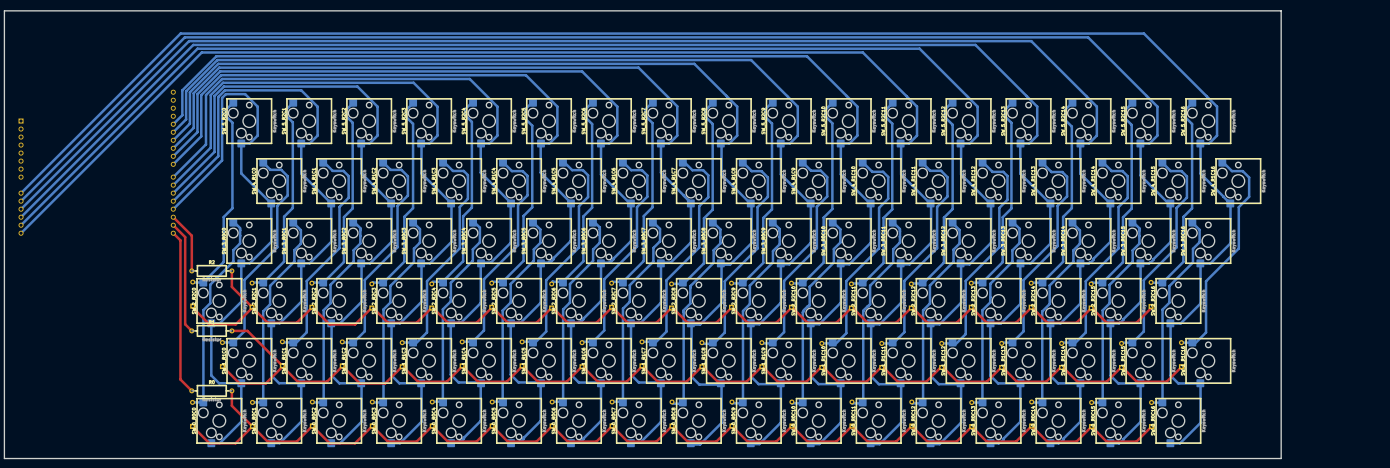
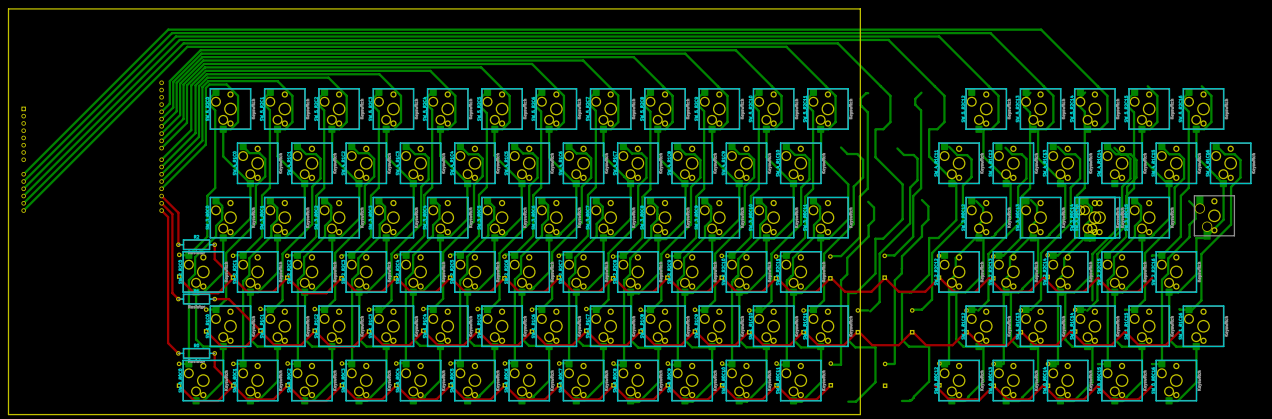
board edge: (4, 10) (1281, 10) (1281, 458) (4, 458) (4, 10) -> (8, 8) (8, 414) (860, 414) (860, 8) (8, 8)
bottom track: none -> (1147, 86) (1157, 95) (1157, 122) (1150, 129) (1142, 129)
bottom track: none -> (1201, 86) (1211, 95) (1211, 122) (1204, 129) (1196, 129)
bottom track: (1072, 102) (1065, 109) (1065, 120) (1071, 126) (1071, 208) (1063, 216) (1063, 261) (1042, 282) (1031, 283) -> none
bottom track: none -> (1189, 92) (1182, 99) (1182, 105) (1188, 111) (1188, 187) (1180, 195) (1180, 236) (1161, 255) (1151, 255)
bottom track: none -> (1134, 92) (1128, 98) (1128, 106) (1134, 112) (1134, 188) (1126, 196) (1126, 236) (1107, 255)
part position: (968, 123) -> (986, 110)
part position: (1028, 123) -> (1040, 110)
part position: (1088, 123) -> (1094, 110)
part position: (1148, 123) -> (1149, 110)
part position: (1208, 123) -> (1203, 110)
bottom track: (1200, 143) (1200, 173) (1230, 203) (1230, 243) (1210, 263) (1200, 263) (1200, 281) -> (1109, 147) (1115, 154) (1125, 154) (1130, 158) (1130, 178) (1122, 186) (1122, 224) (1092, 254)
bottom track: none -> (1142, 129) (1142, 158) (1169, 185) (1169, 218) (1151, 237) (1142, 238) (1142, 272) (1123, 291) (1114, 292) (1114, 339) (1121, 346) (1142, 346) (1142, 381) (1123, 400) (1114, 401)
bottom track: none -> (1196, 129) (1196, 156) (1223, 183) (1223, 219) (1205, 238) (1196, 238) (1196, 274) (1178, 292) (1169, 292) (1169, 339) (1176, 346) (1196, 346) (1196, 382) (1177, 400) (1169, 400)
bottom track: none -> (1161, 146) (1169, 154) (1179, 154) (1184, 159) (1184, 178) (1174, 187) (1174, 223) (1145, 253) (1145, 299) (1134, 309) (1125, 309)
bottom track: none -> (1218, 147) (1224, 154) (1234, 154) (1240, 160) (1240, 177) (1231, 186) (1231, 224) (1201, 254) (1201, 300) (1191, 310)
part position: (938, 182) -> (959, 165)
part position: (998, 182) -> (1013, 165)
part position: (1058, 182) -> (1067, 165)
part position: (1118, 182) -> (1122, 165)
part position: (1178, 182) -> (1176, 165)
part position: (1238, 182) -> (1230, 165)
bottom track: none -> (1134, 200) (1140, 206) (1140, 220) (1134, 226) (1134, 236) (1113, 257) (1113, 274) (1107, 280) (1107, 363)
bottom track: none -> (1189, 201) (1195, 207) (1195, 218) (1189, 224) (1189, 237) (1168, 258) (1168, 273) (1161, 279) (1161, 364) (1152, 364)
part: none -> (1214, 217)
part position: (968, 242) -> (986, 219)
part position: (1028, 242) -> (1040, 219)
part position: (1088, 242) -> (1094, 219)
part position: (1148, 242) -> (1149, 219)
part position: (938, 302) -> (959, 273)
part position: (998, 302) -> (1013, 273)
part position: (1058, 302) -> (1067, 273)
part position: (1118, 302) -> (1122, 273)
part position: (1178, 302) -> (1176, 273)
top track: (1151, 307) (1136, 322) (1130, 322) -> (1152, 278) (1138, 291) (1111, 291) (1097, 278) (1084, 291) (1057, 291) (1043, 277) (1029, 291)
top track: (1052, 322) (1076, 322) (1091, 307) (1106, 322) -> (975, 291) (989, 278) (1002, 291) (1007, 291)
bottom track: none -> (1179, 309) (1189, 309)
part position: (968, 362) -> (986, 327)
part position: (1028, 362) -> (1040, 327)
part position: (1088, 362) -> (1094, 327)
part position: (1148, 362) -> (1149, 327)
part position: (1208, 362) -> (1203, 327)
top track: (1181, 366) (1166, 381) (1160, 381) -> (1179, 331) (1165, 345) (1138, 345) (1125, 331) (1111, 345) (1084, 345) (1070, 331) (1056, 345)
bottom track: none -> (1097, 364) (1107, 364)
part position: (938, 422) -> (959, 382)
part position: (998, 422) -> (1013, 382)
part position: (1058, 422) -> (1067, 382)
part position: (1118, 422) -> (1122, 382)
part position: (1178, 422) -> (1176, 382)
top track: (911, 426) (927, 441) (956, 441) (971, 426) (986, 441) (1016, 441) (1031, 426) (1047, 441) -> (934, 385) (948, 399) (953, 399)
top track: (1151, 426) (1136, 441) (1130, 441) -> (1152, 385) (1138, 399) (1111, 399) (1097, 385) (1084, 399) (1057, 399) (1043, 385) (1029, 399)

